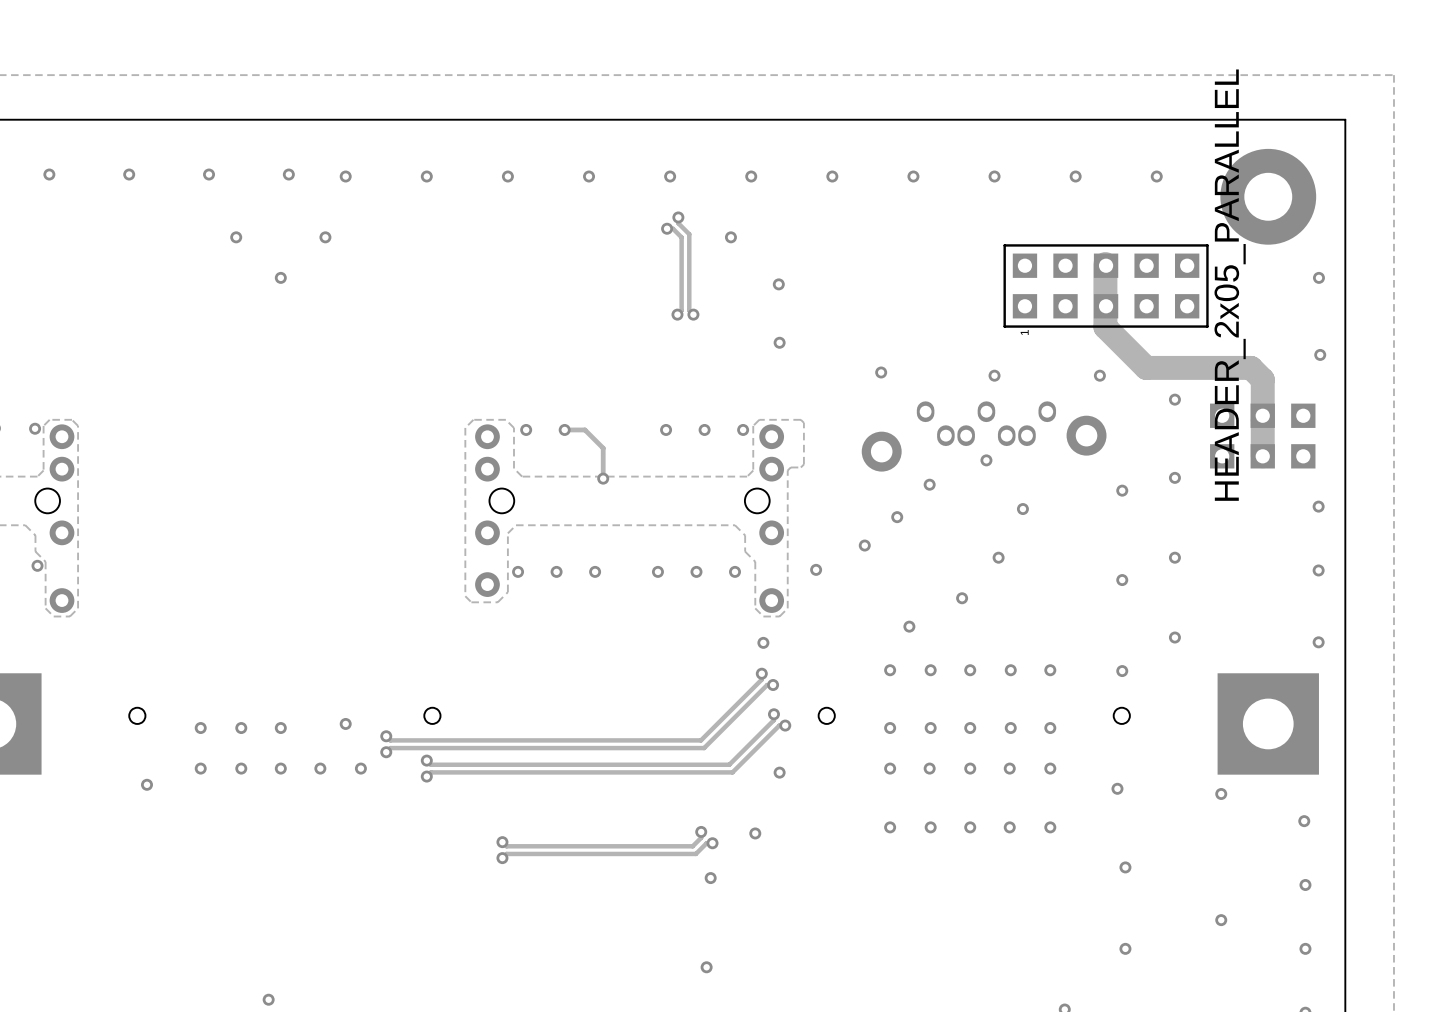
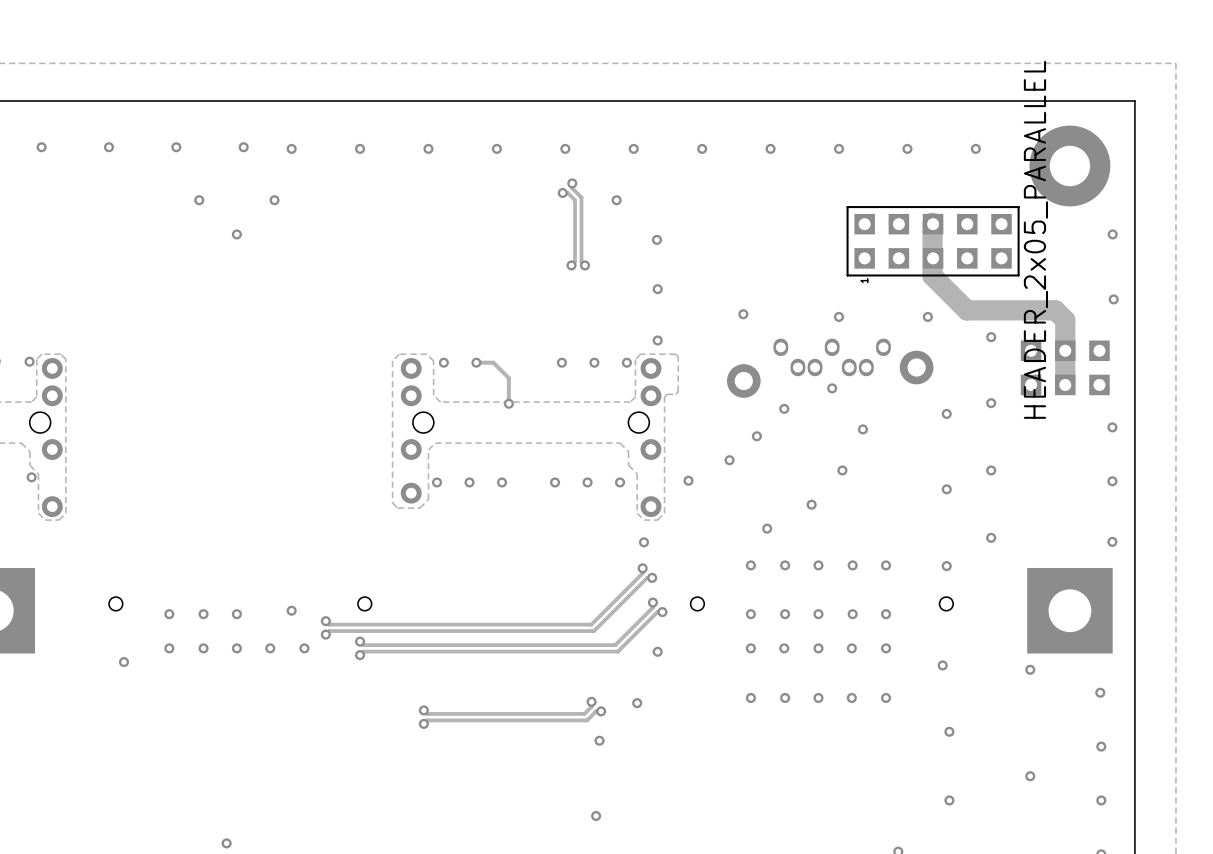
via: none -> (657, 340)

